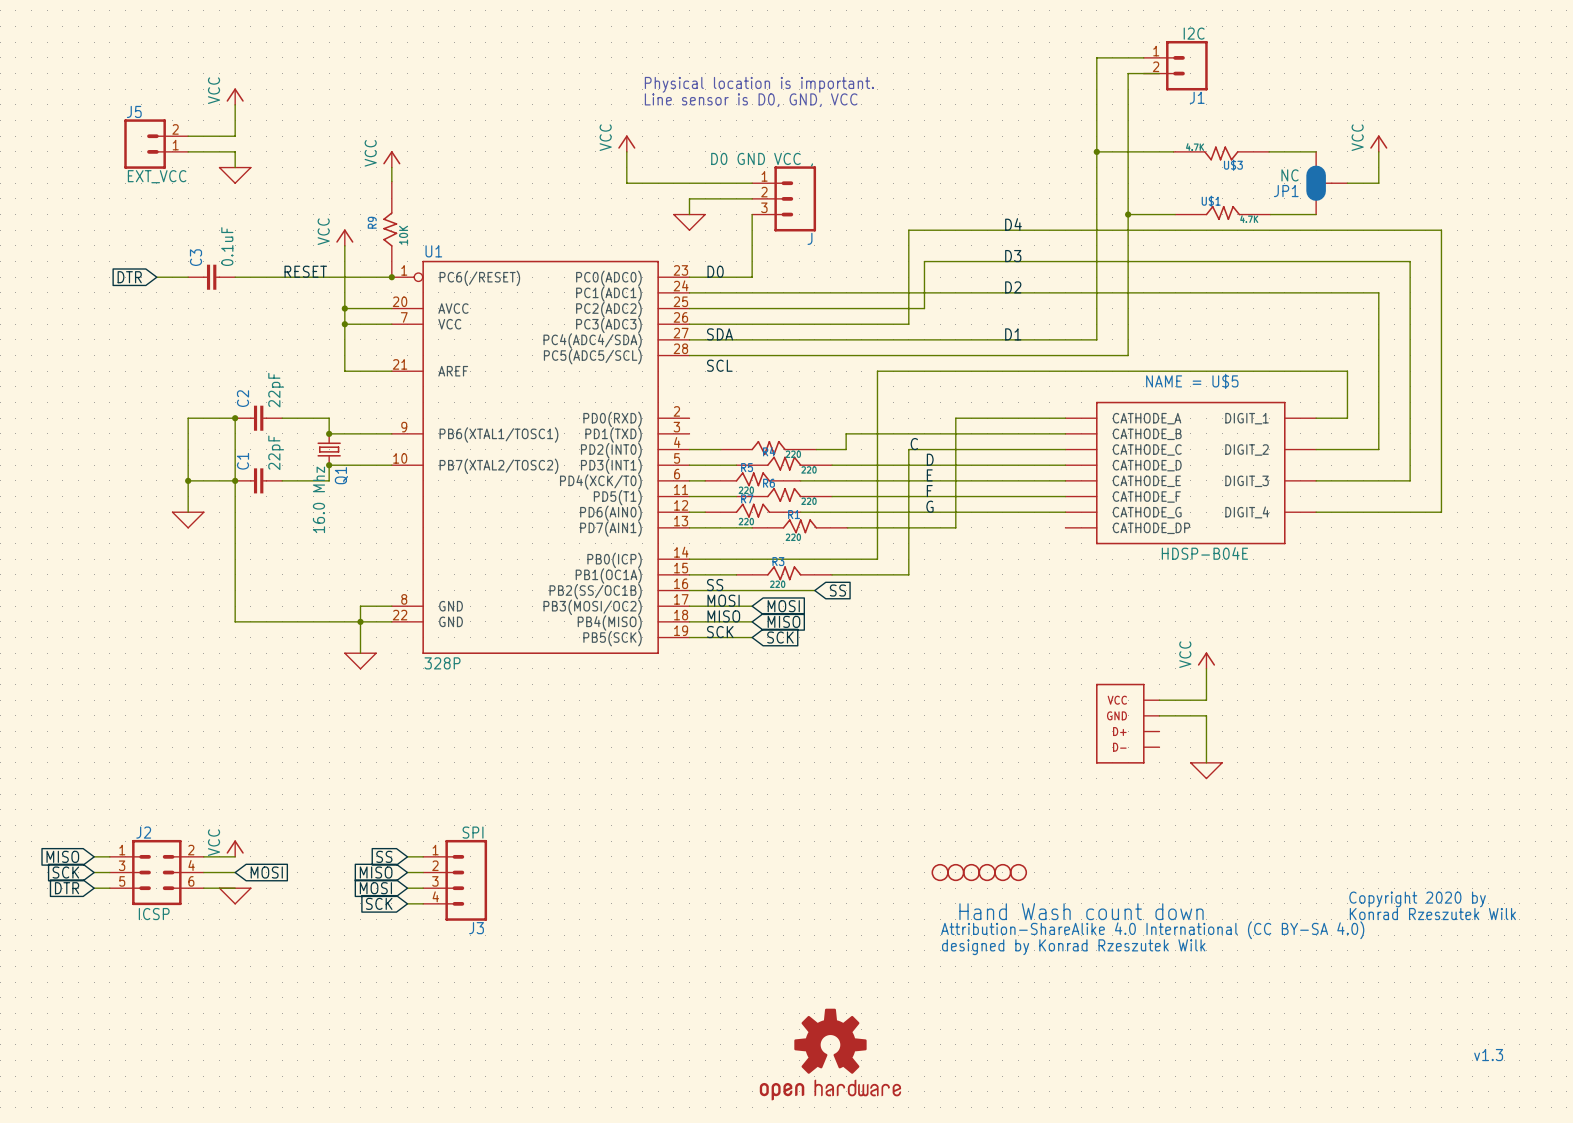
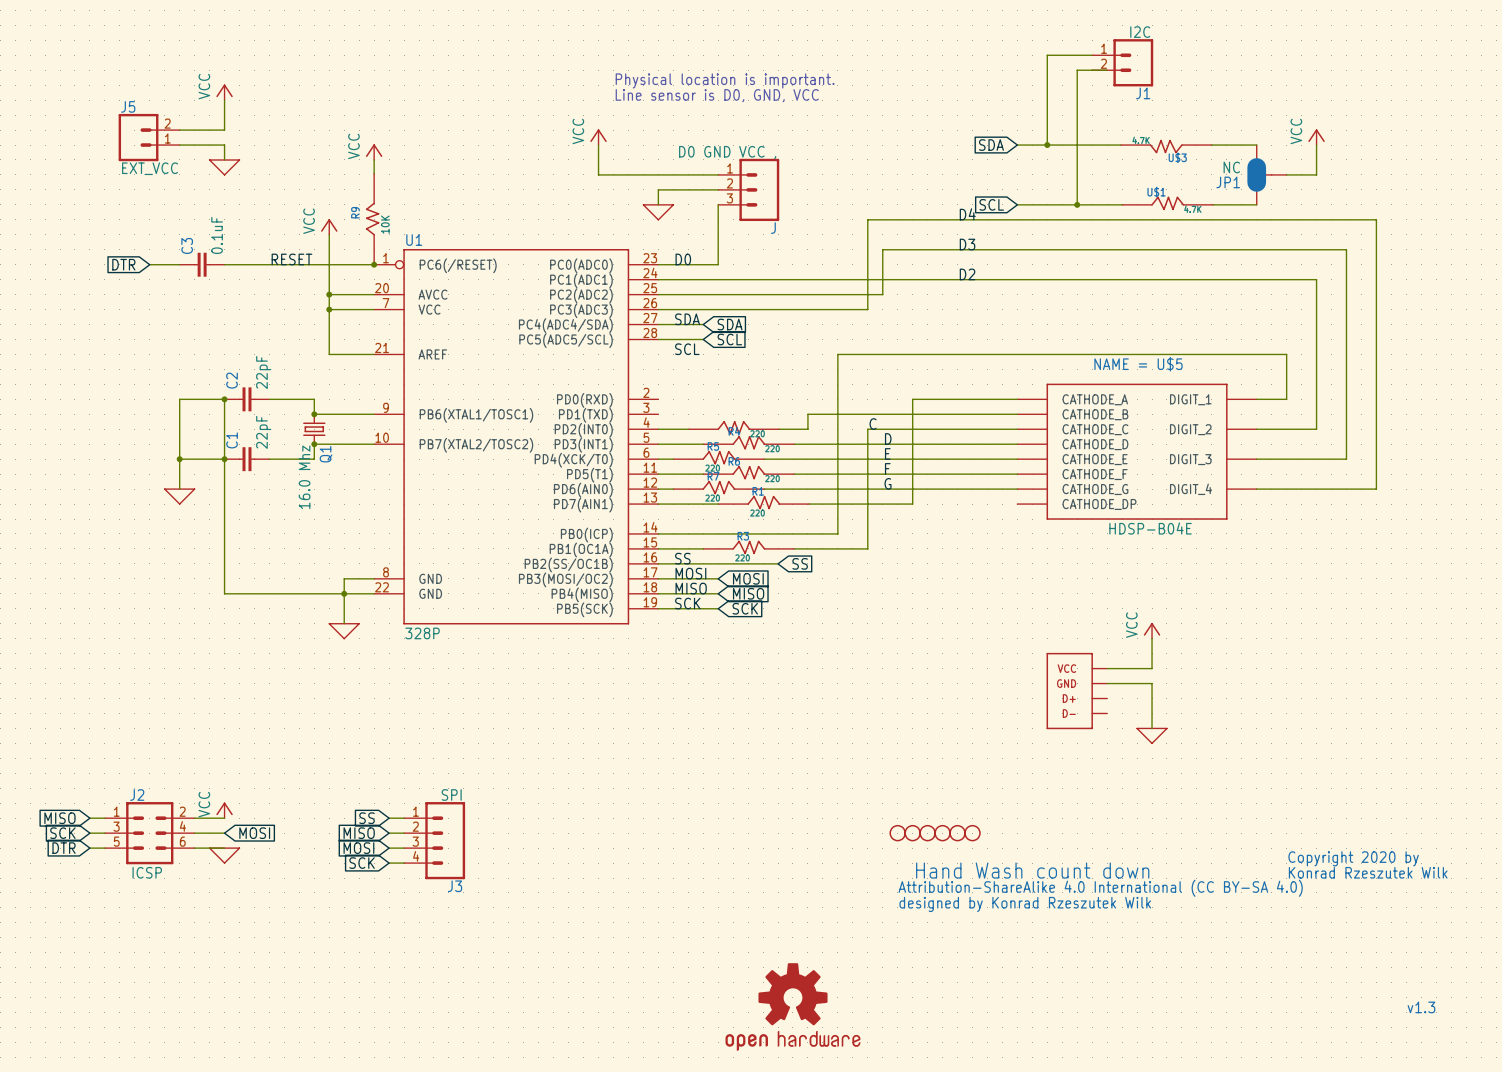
global label: none -> SDA (991, 145)
wire: (1096, 151) (1096, 339) (736, 339) -> (1047, 145) (1017, 145)
global label: none -> SCL (991, 204)
wire: (1128, 214) (1128, 355) (736, 355) -> (1077, 204) (1017, 204)
label: D1 (1013, 334) -> none
global label: none -> SDA (730, 324)
global label: none -> SCL (729, 339)

